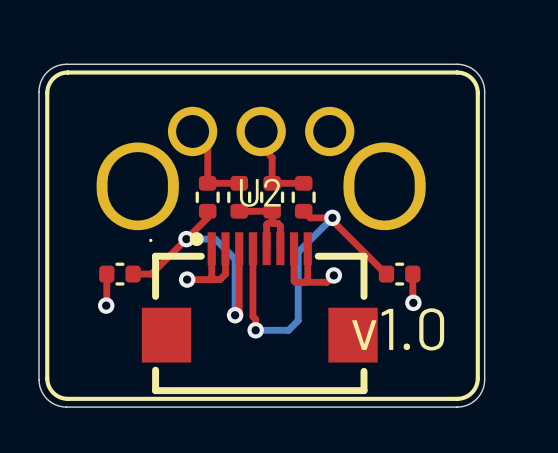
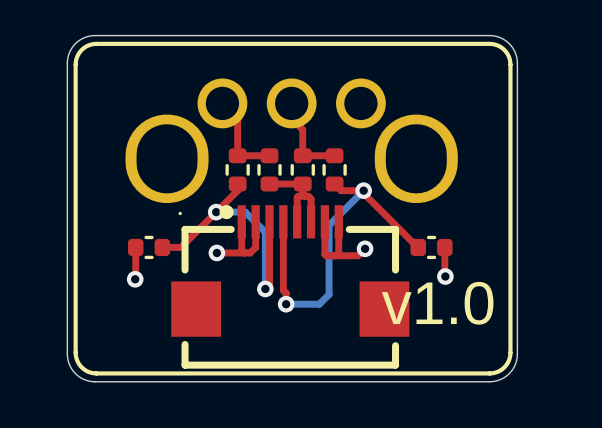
U2 name: U2 (260, 192) -> none

